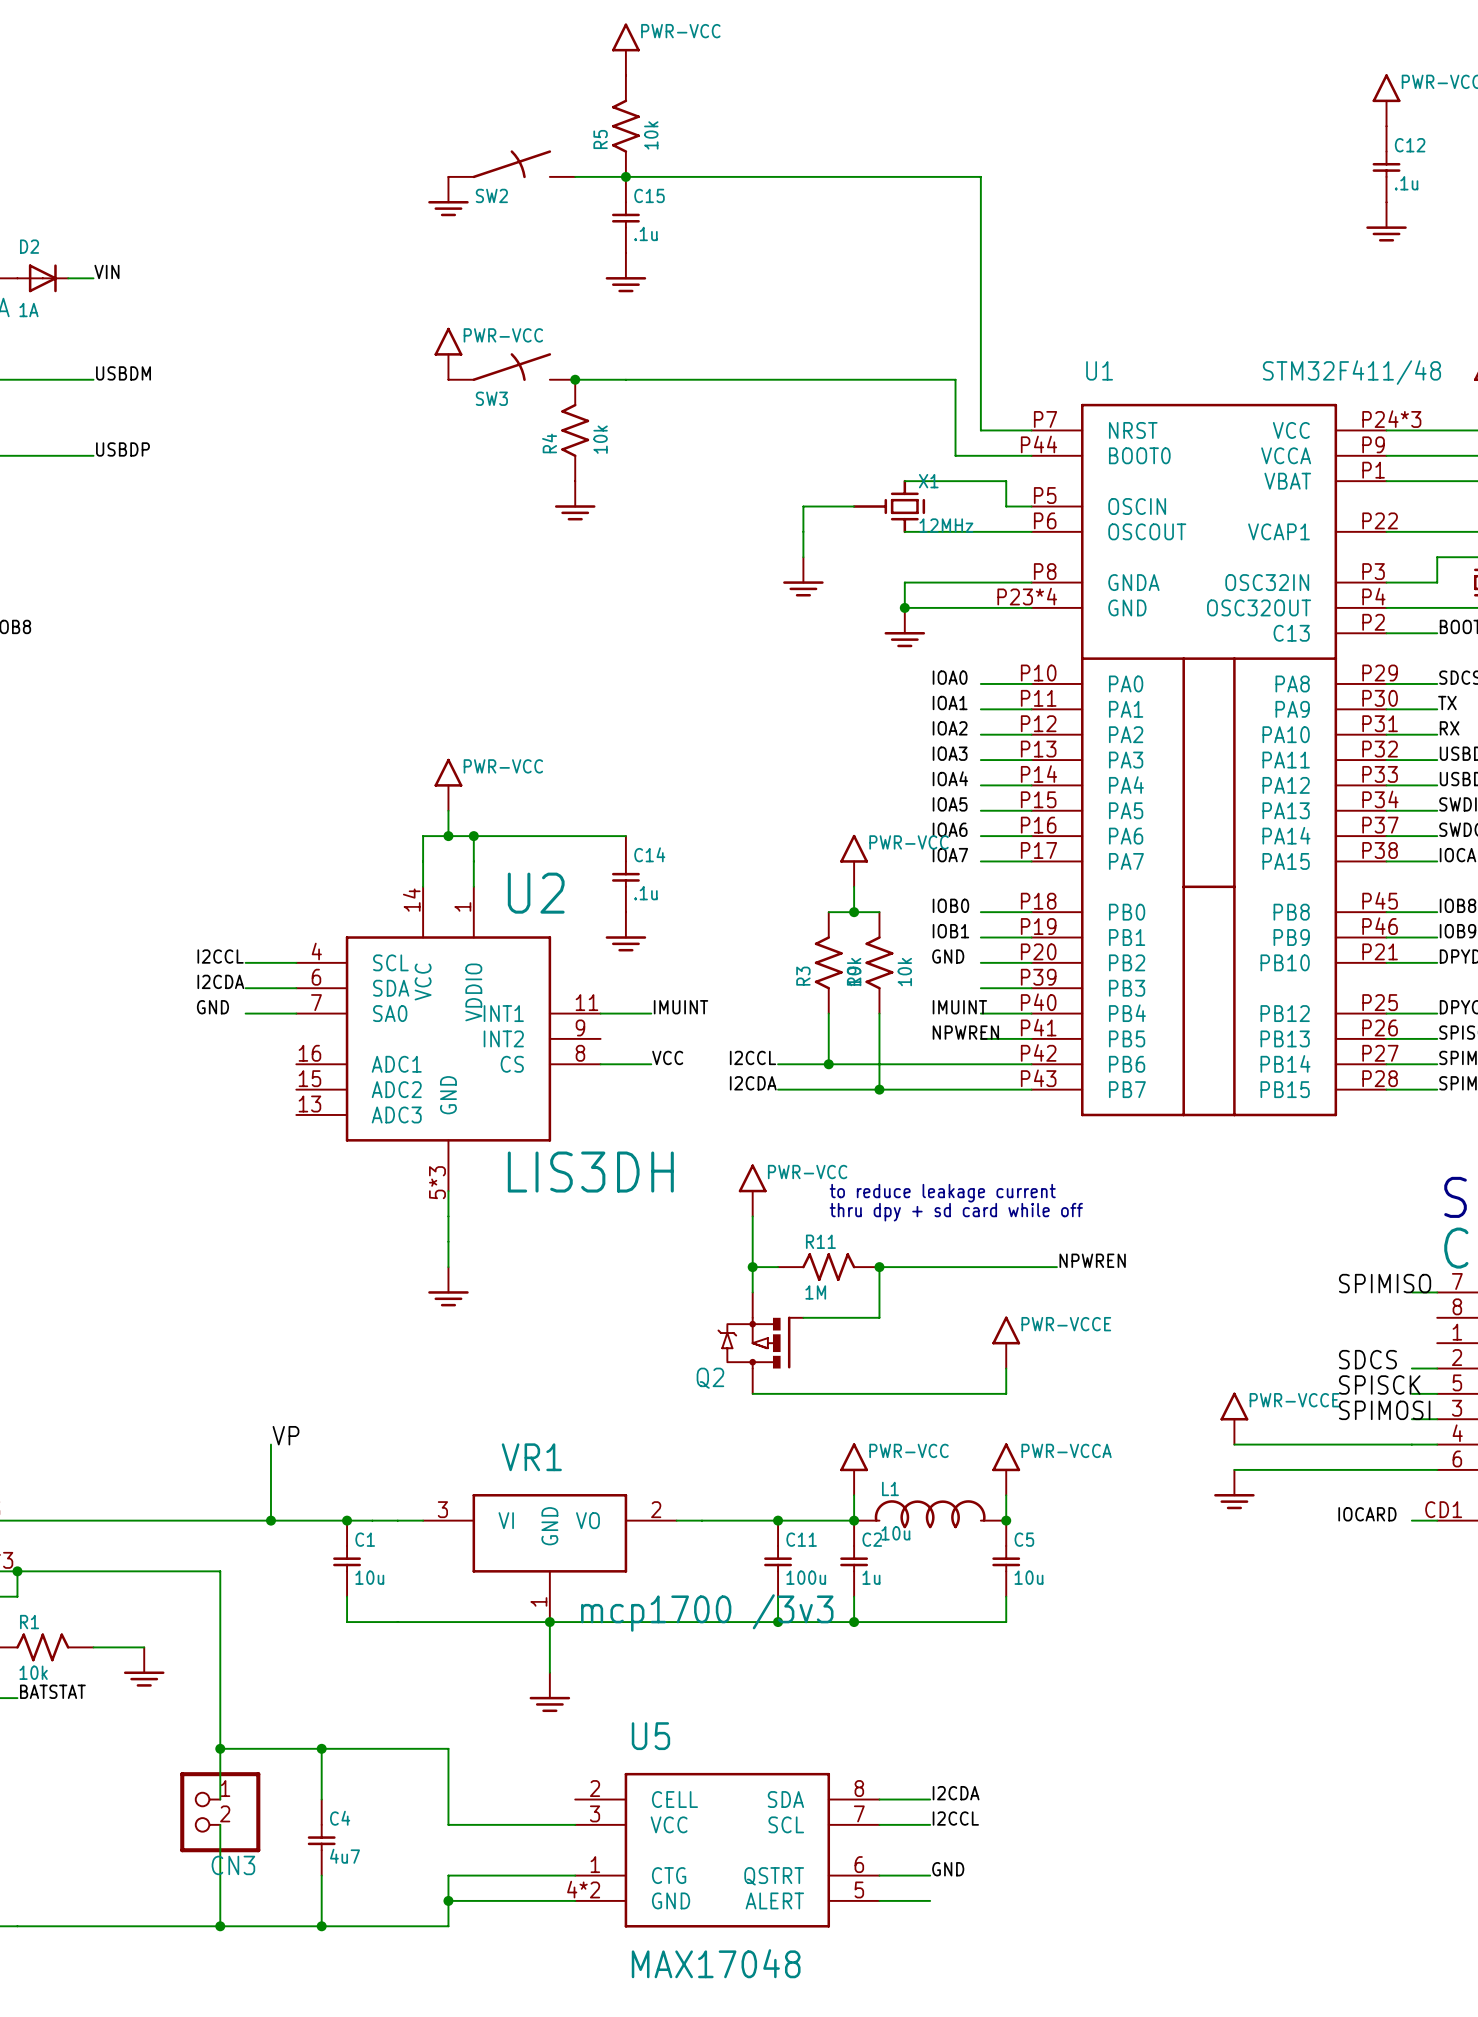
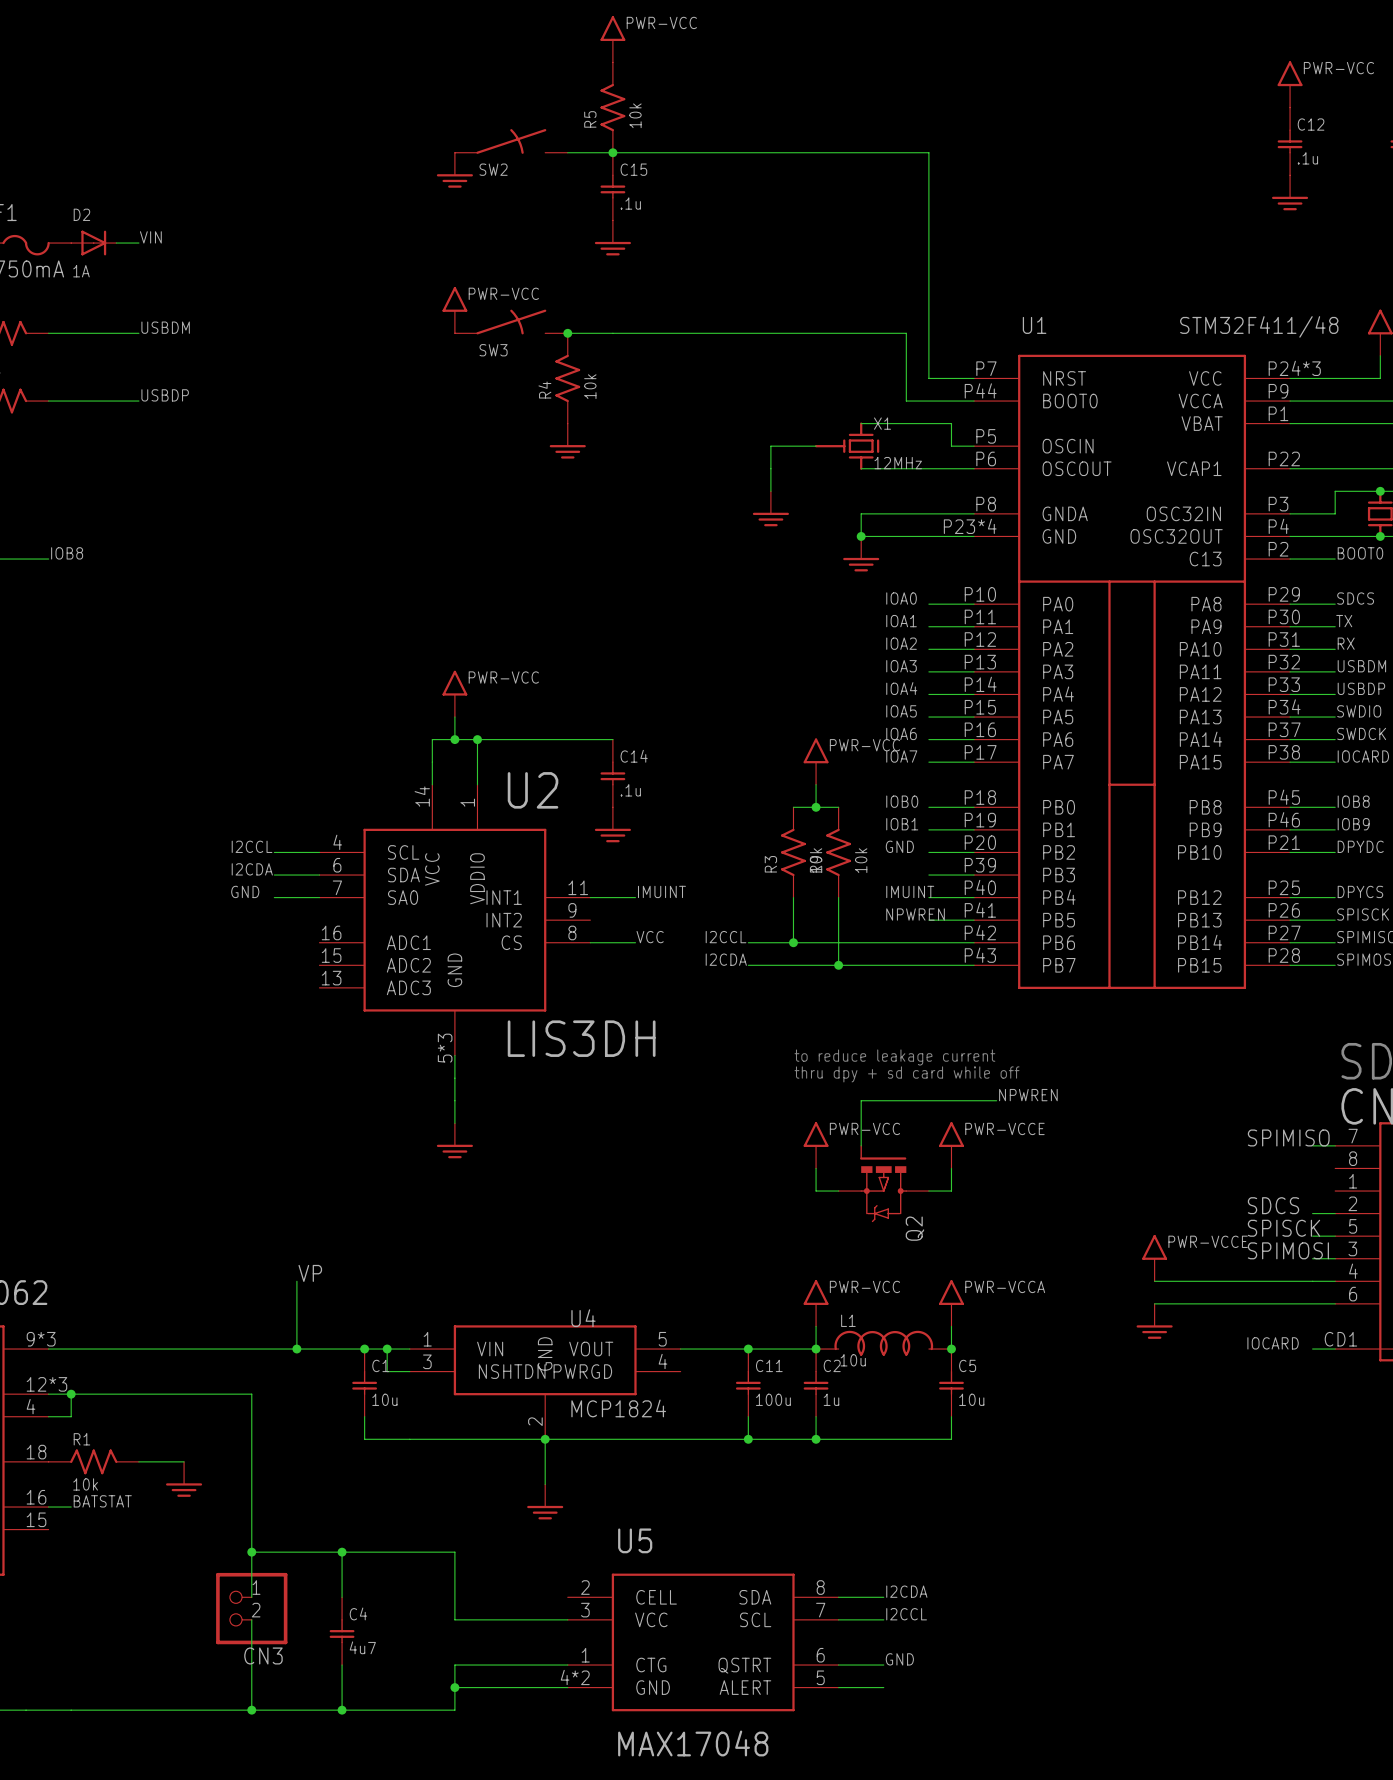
power symbol position: PWR-VCC (752, 1190) -> PWR-VCC (816, 1145)
wire: (752, 1216) (752, 1292) -> none
wire: none -> (996, 1100) (861, 1100) (861, 1145)
label position: NPWREN (1092, 1260) -> NPWREN (1028, 1095)
wire: (752, 1267) (778, 1267) -> none
junction: (752, 1267) -> none
R11: 1M (828, 1267) -> none
junction: (879, 1267) -> none
wire: (1056, 1267) (879, 1267) (879, 1317) (803, 1317) -> none
wire: none -> (816, 1168) (816, 1191) (838, 1191)
wire: none -> (951, 1168) (951, 1191) (928, 1191)
Q2 rotation: 0° (760, 1342) -> 90° counterclockwise (883, 1183)
power symbol position: PWR-VCCE (1006, 1342) -> PWR-VCCE (951, 1145)
Q2 position: (760, 1343) -> (883, 1183)
wire: (1006, 1368) (1006, 1393) (752, 1393) -> none
wire: none -> (387, 1349) (387, 1371) (409, 1371)
junction: none -> (387, 1349)
VR1: mcp1700 /3v3 (549, 1558) -> none
U4: none -> MCP1824 (545, 1382)

